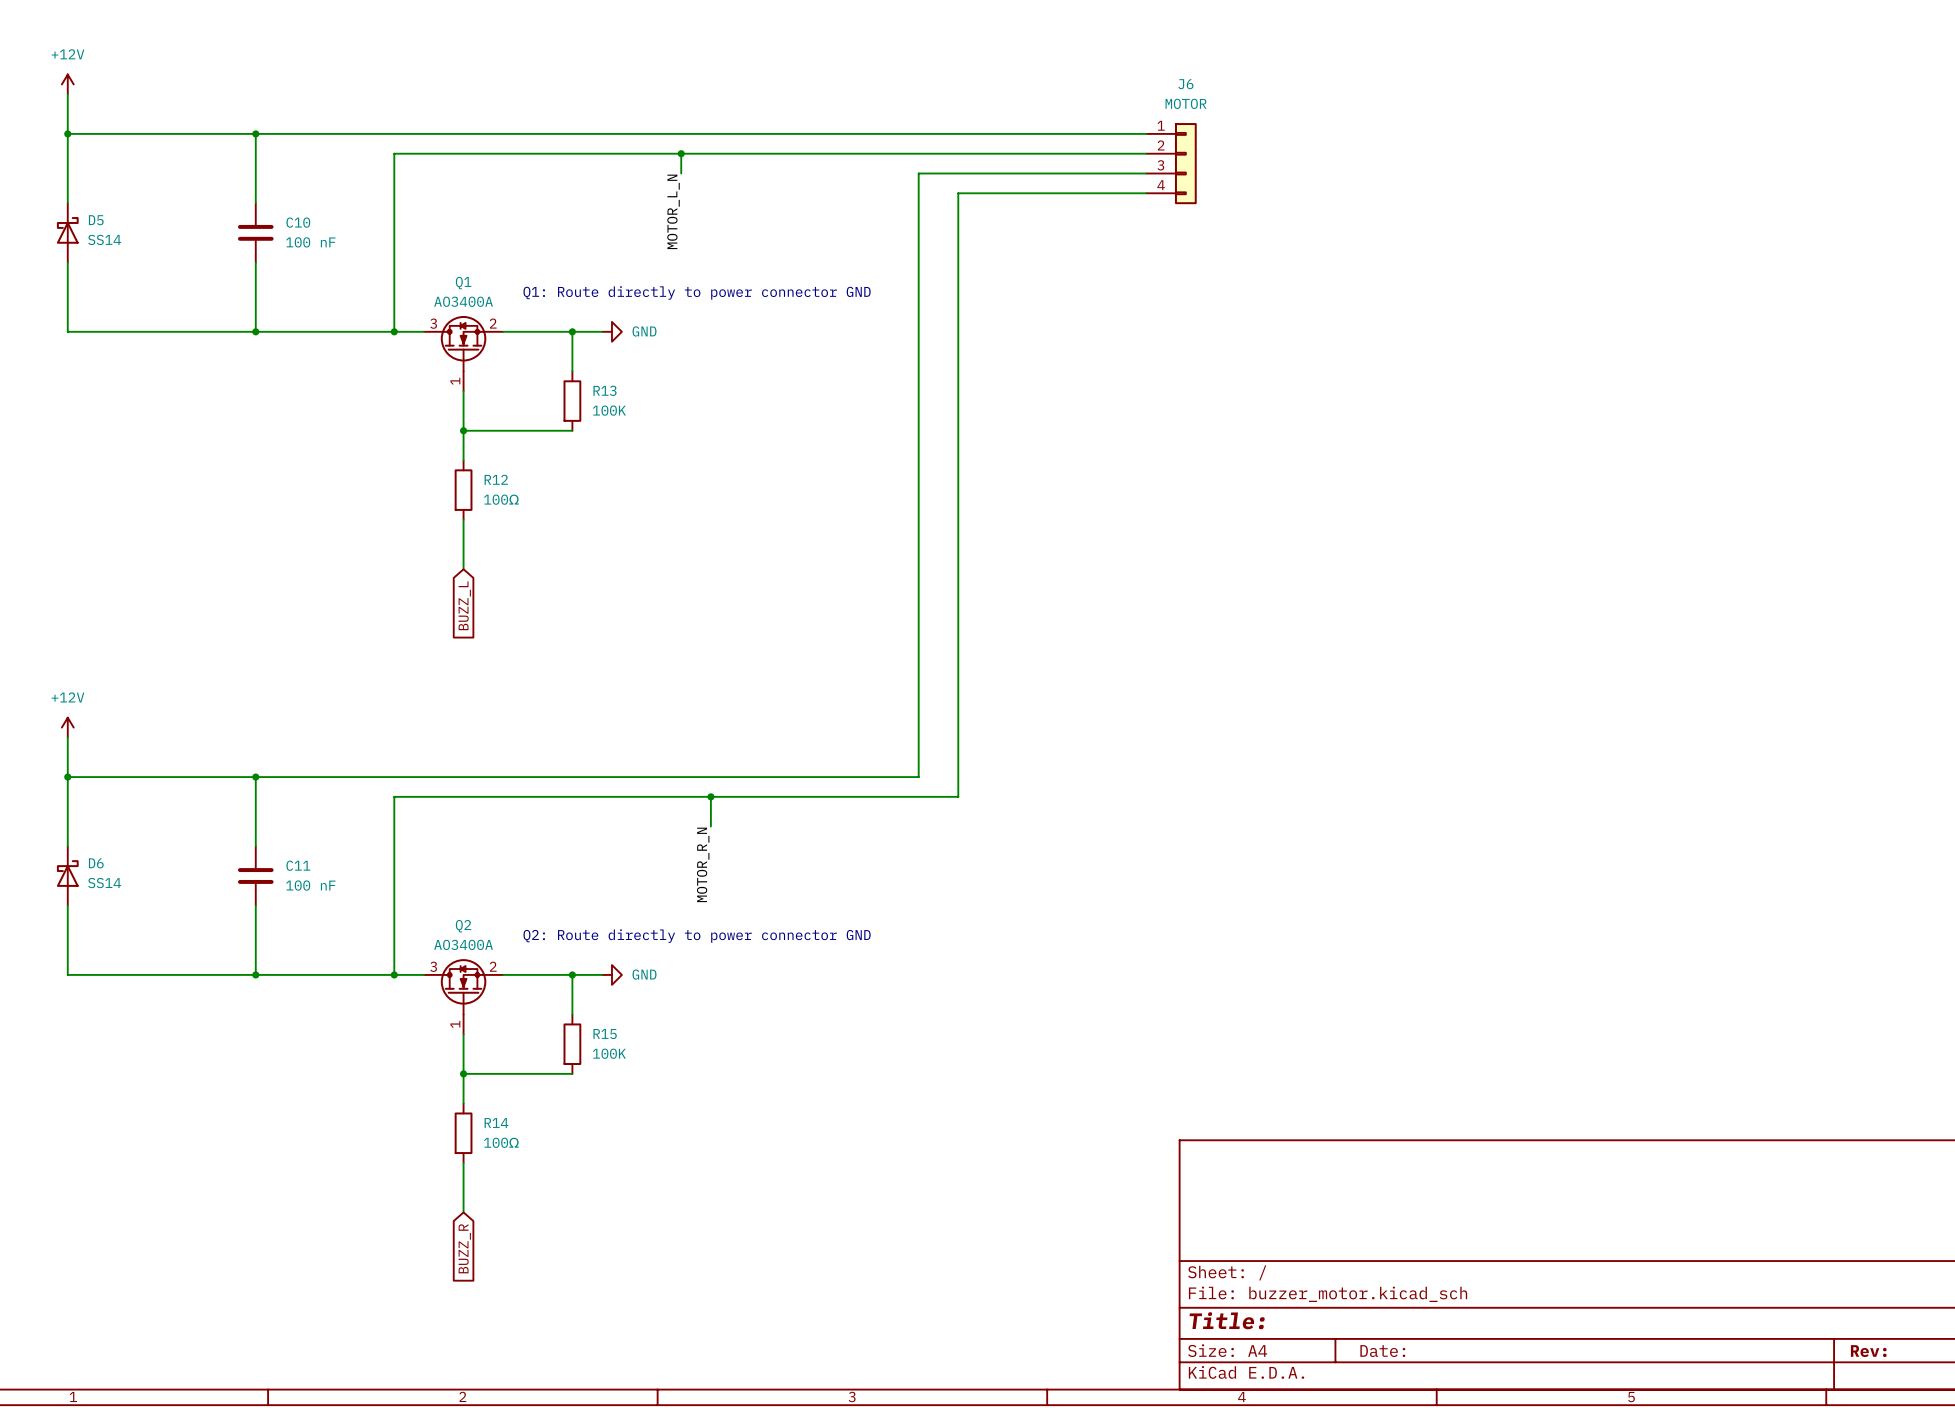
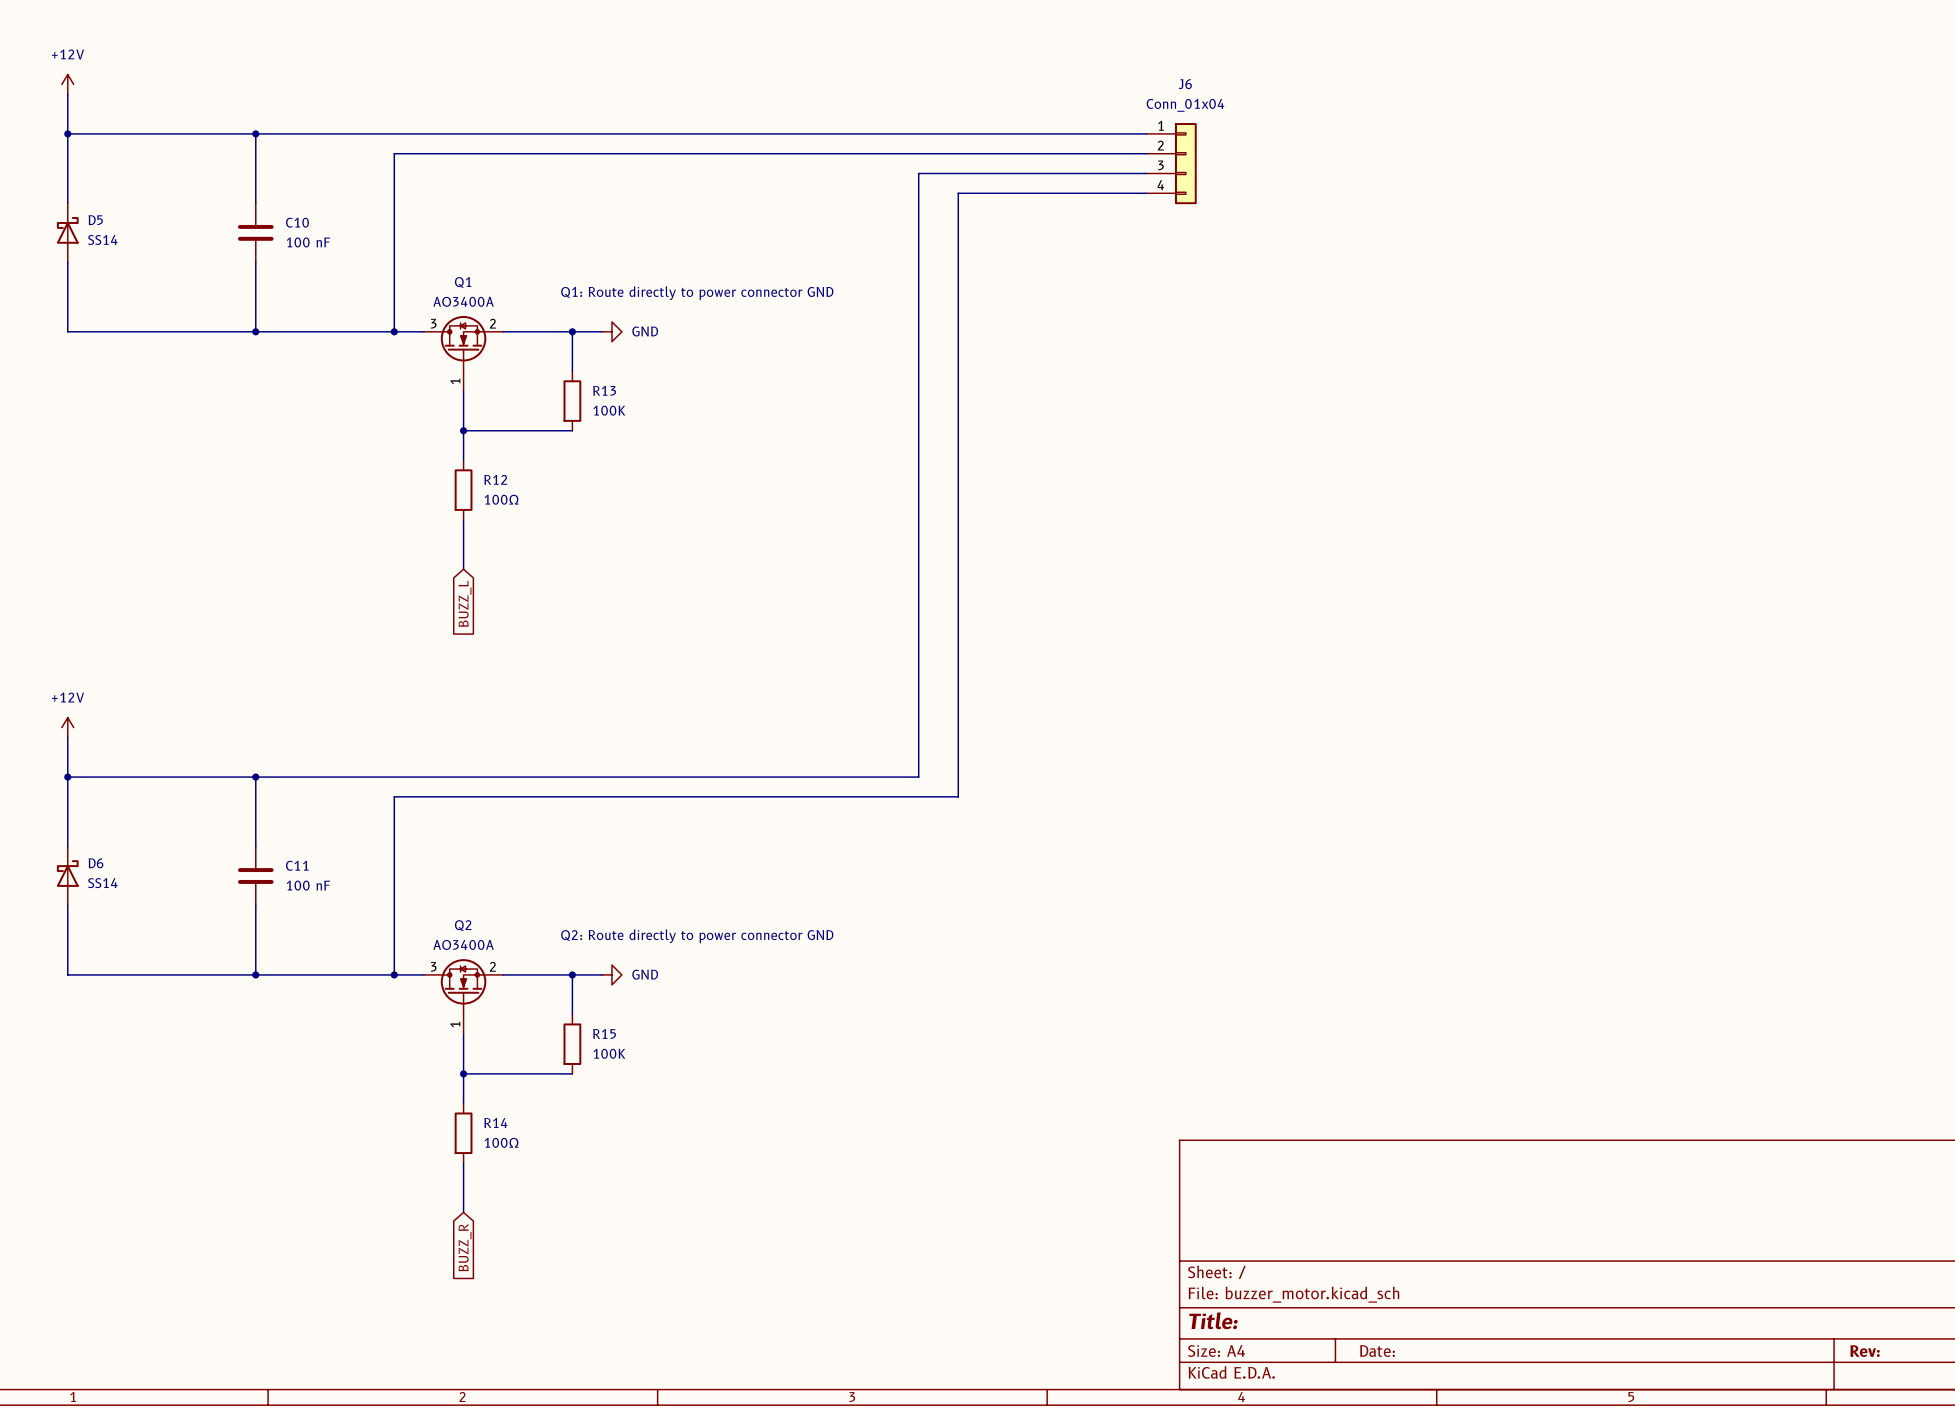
J6 value: MOTOR (1185, 103) -> Conn_01x04 (1185, 105)
wire: (681, 153) (681, 173) -> none
junction: (681, 153) -> none
label: MOTOR_L_N (673, 211) -> none
wire: (710, 796) (710, 826) -> none
junction: (710, 796) -> none
label: MOTOR_R_N (703, 864) -> none

